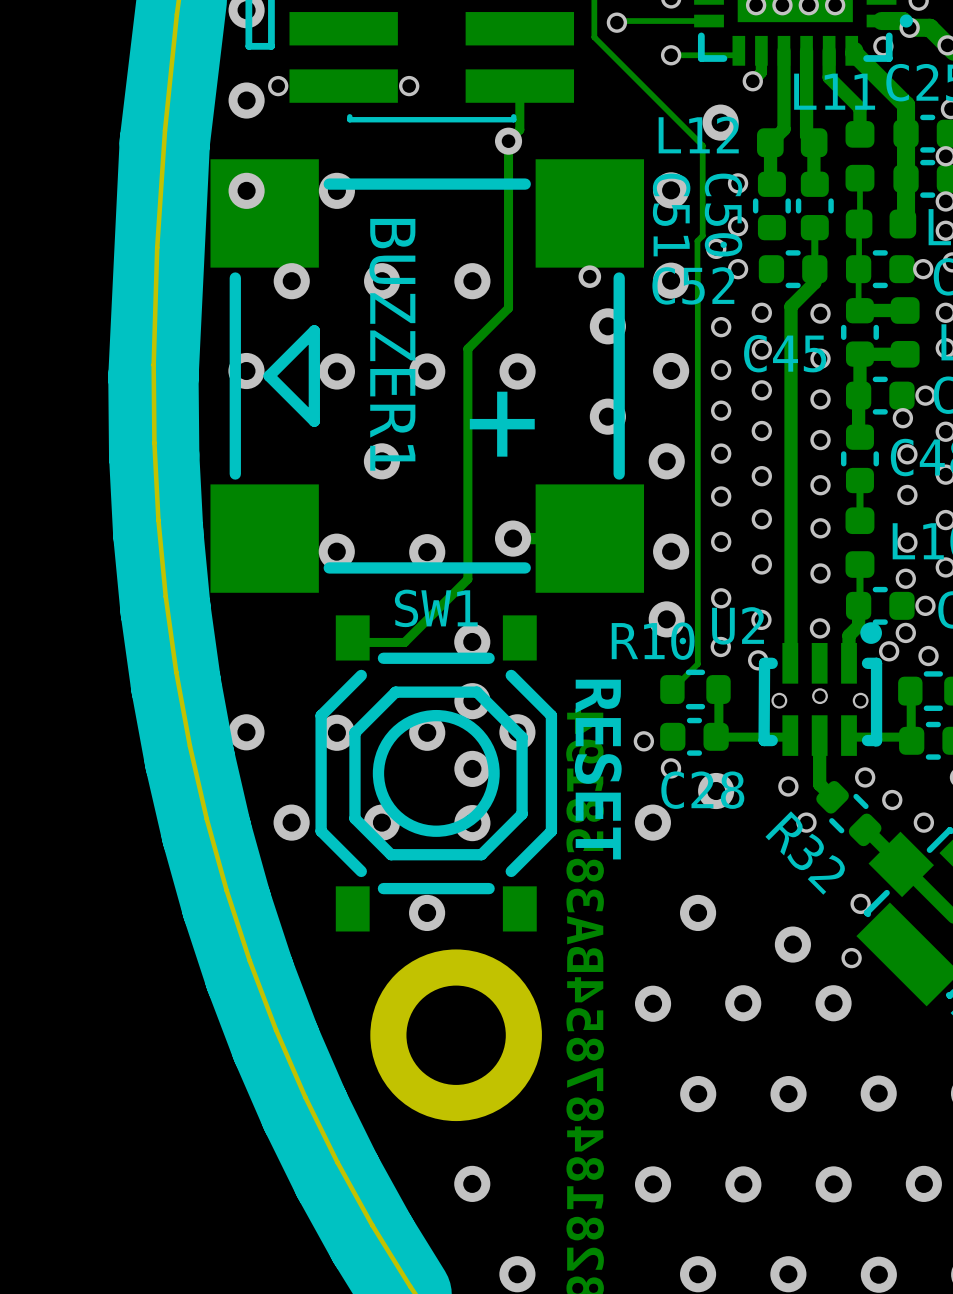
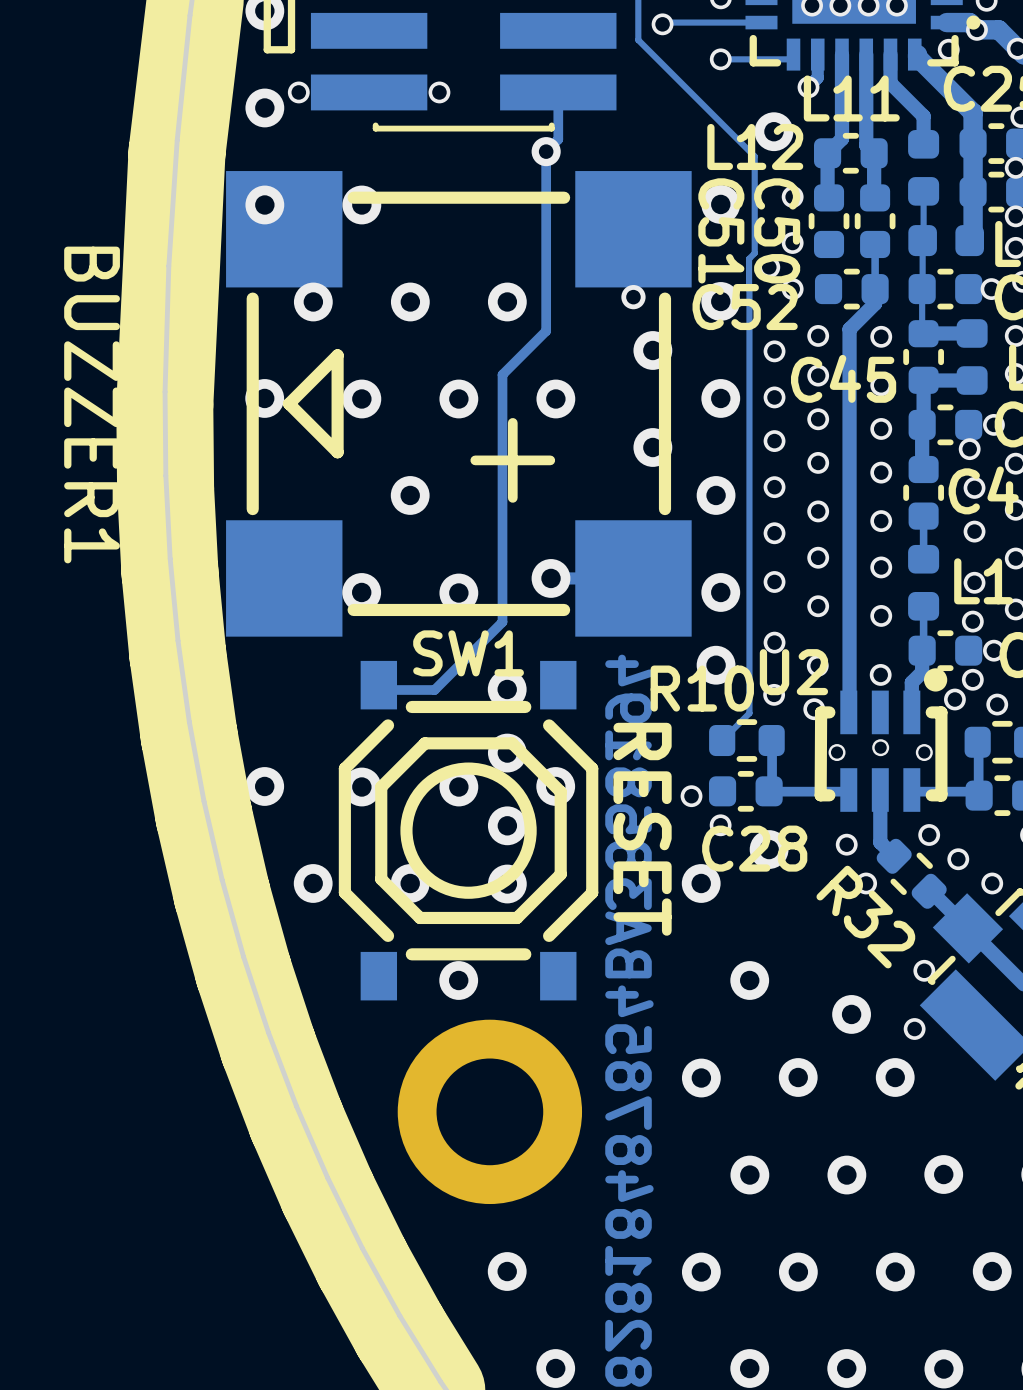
L11 name position: L11 (834, 91) -> L11 (851, 98)
L12 footprint: [757, 128, 828, 158] -> [813, 132, 888, 174]
BUZZER1 name position: BUZZER1 (392, 344) -> BUZZER1 (92, 404)

